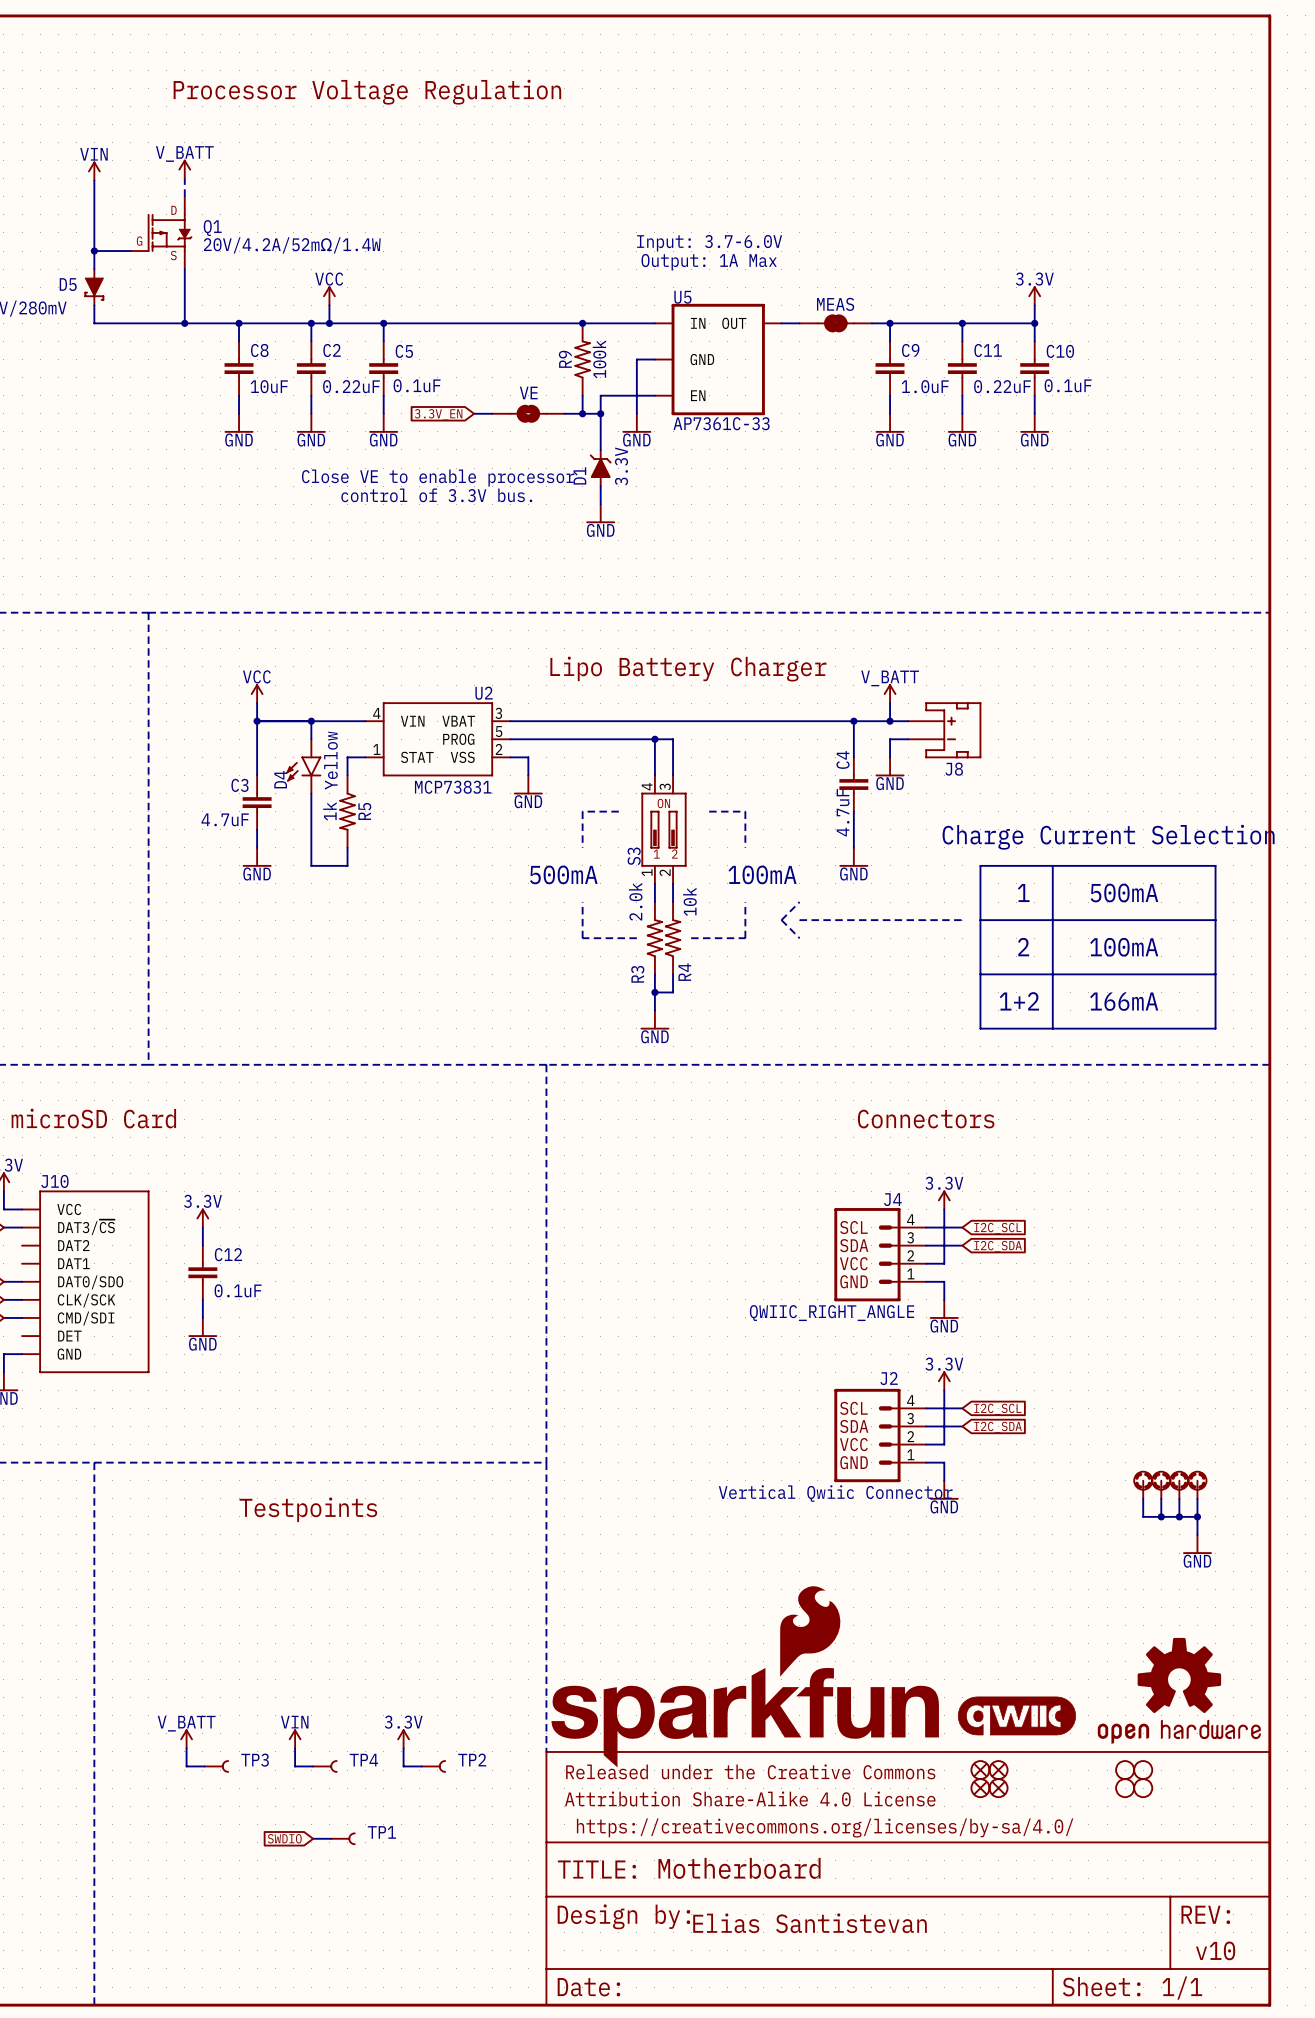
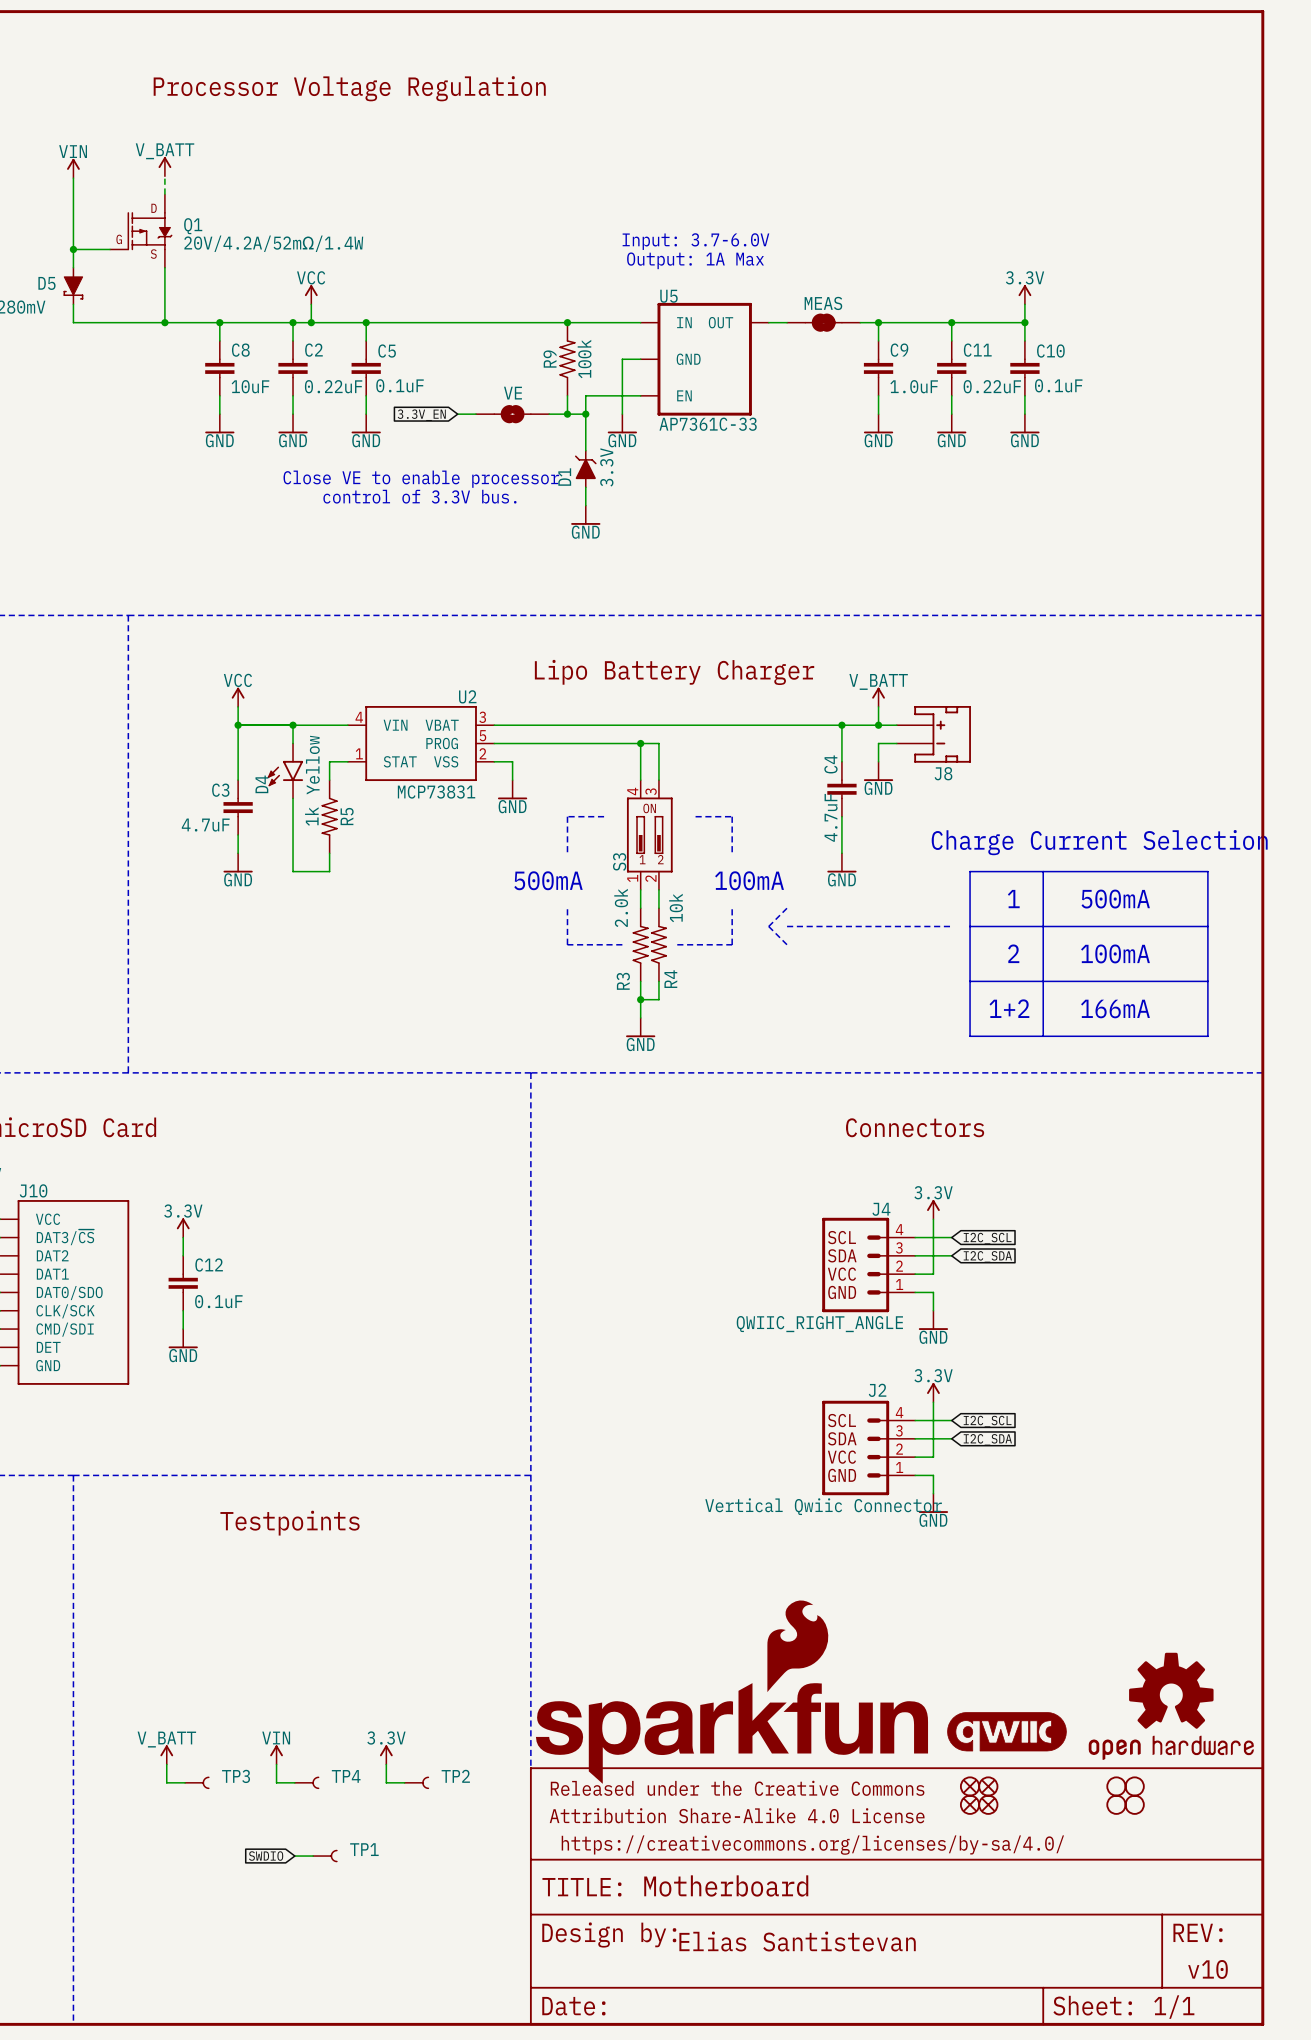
part: (1143, 1484) -> none
part: (1161, 1484) -> none
part: (1179, 1484) -> none
part: (1197, 1484) -> none
wire: (1143, 1498) (1143, 1516) (1197, 1516) -> none
wire: (1161, 1498) (1161, 1516) -> none
wire: (1179, 1498) (1179, 1516) -> none
wire: (1197, 1498) (1197, 1534) -> none
junction: (1161, 1516) -> none
junction: (1179, 1516) -> none
junction: (1197, 1516) -> none
power symbol: GND (1197, 1544) -> none

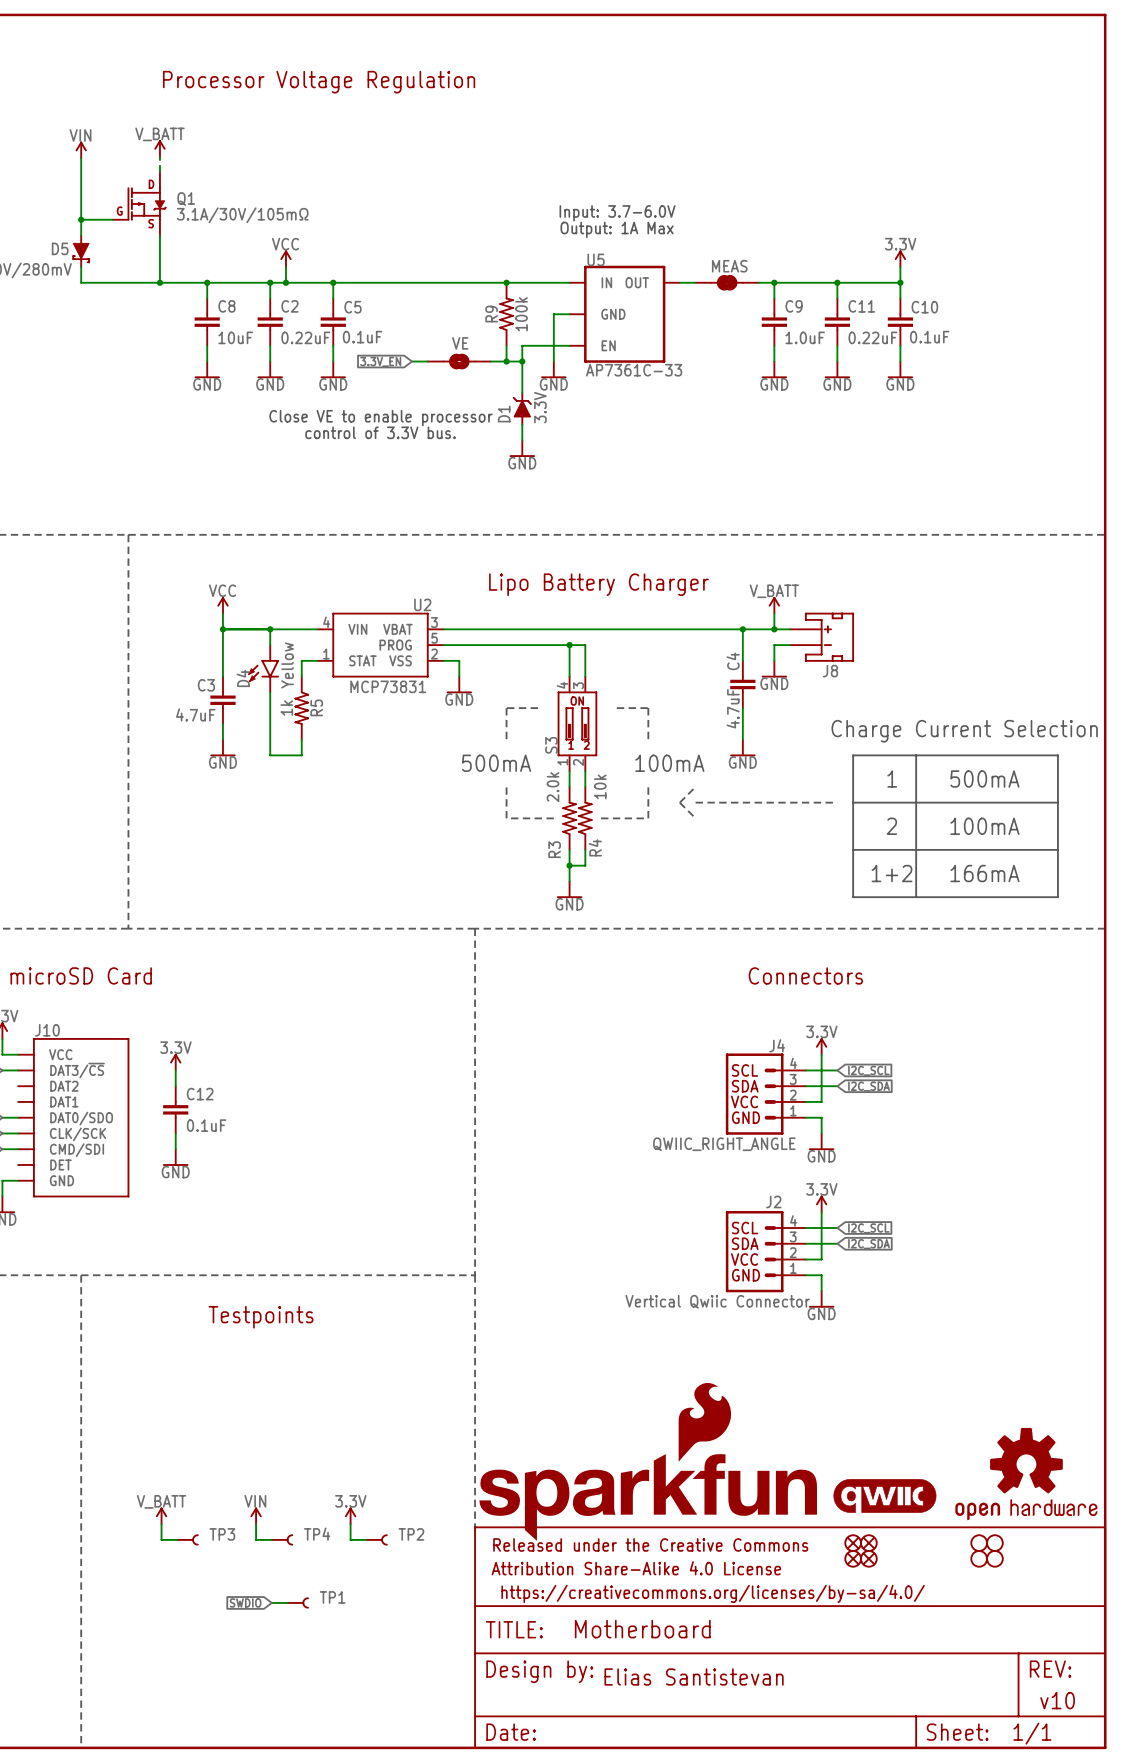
Q1 value: 20V/4.2A/52mΩ/1.4W (273, 243) -> 3.1A/30V/105mΩ (242, 215)

